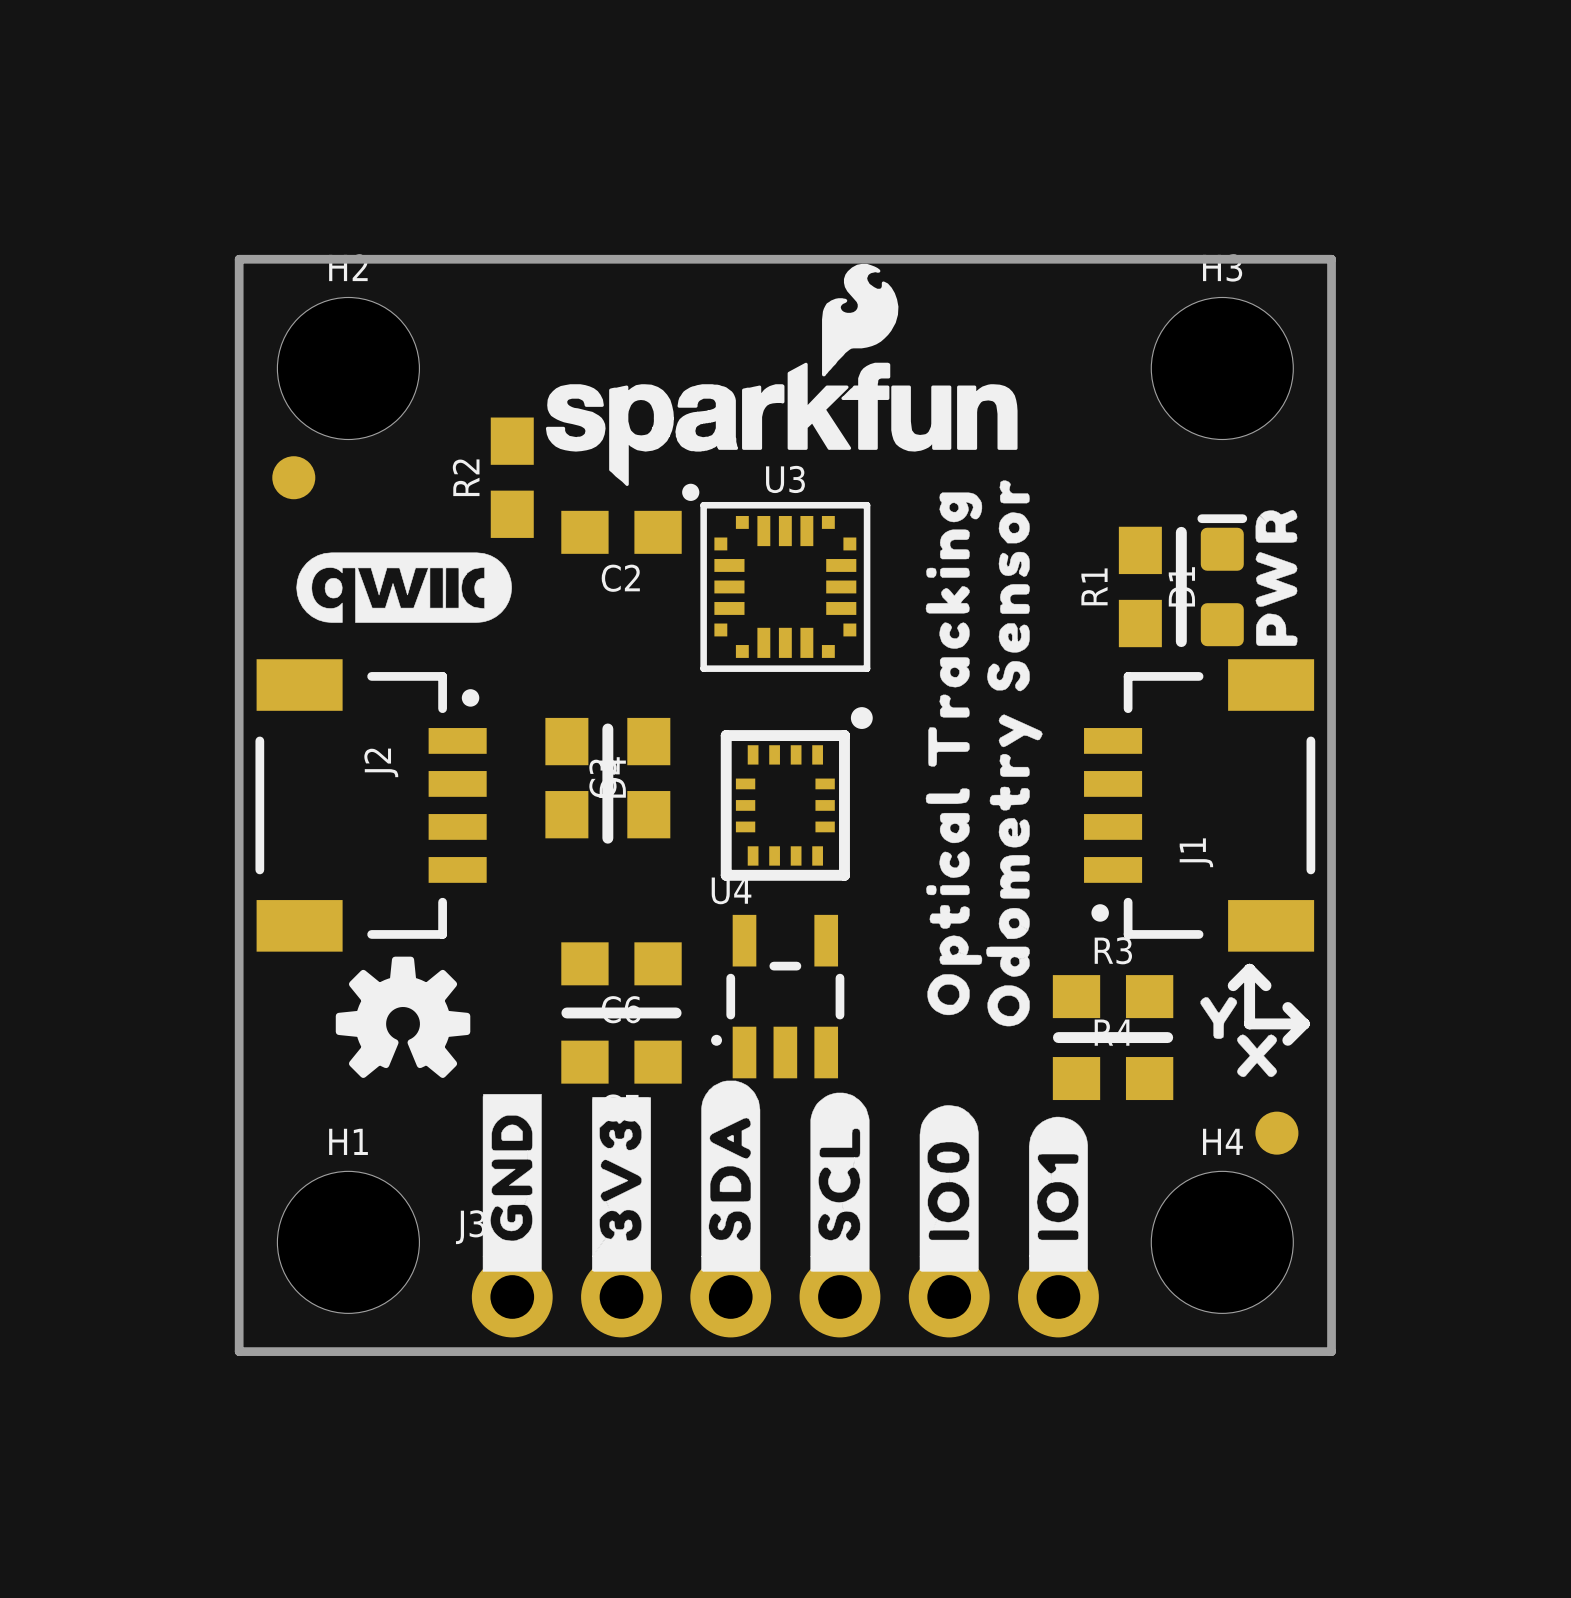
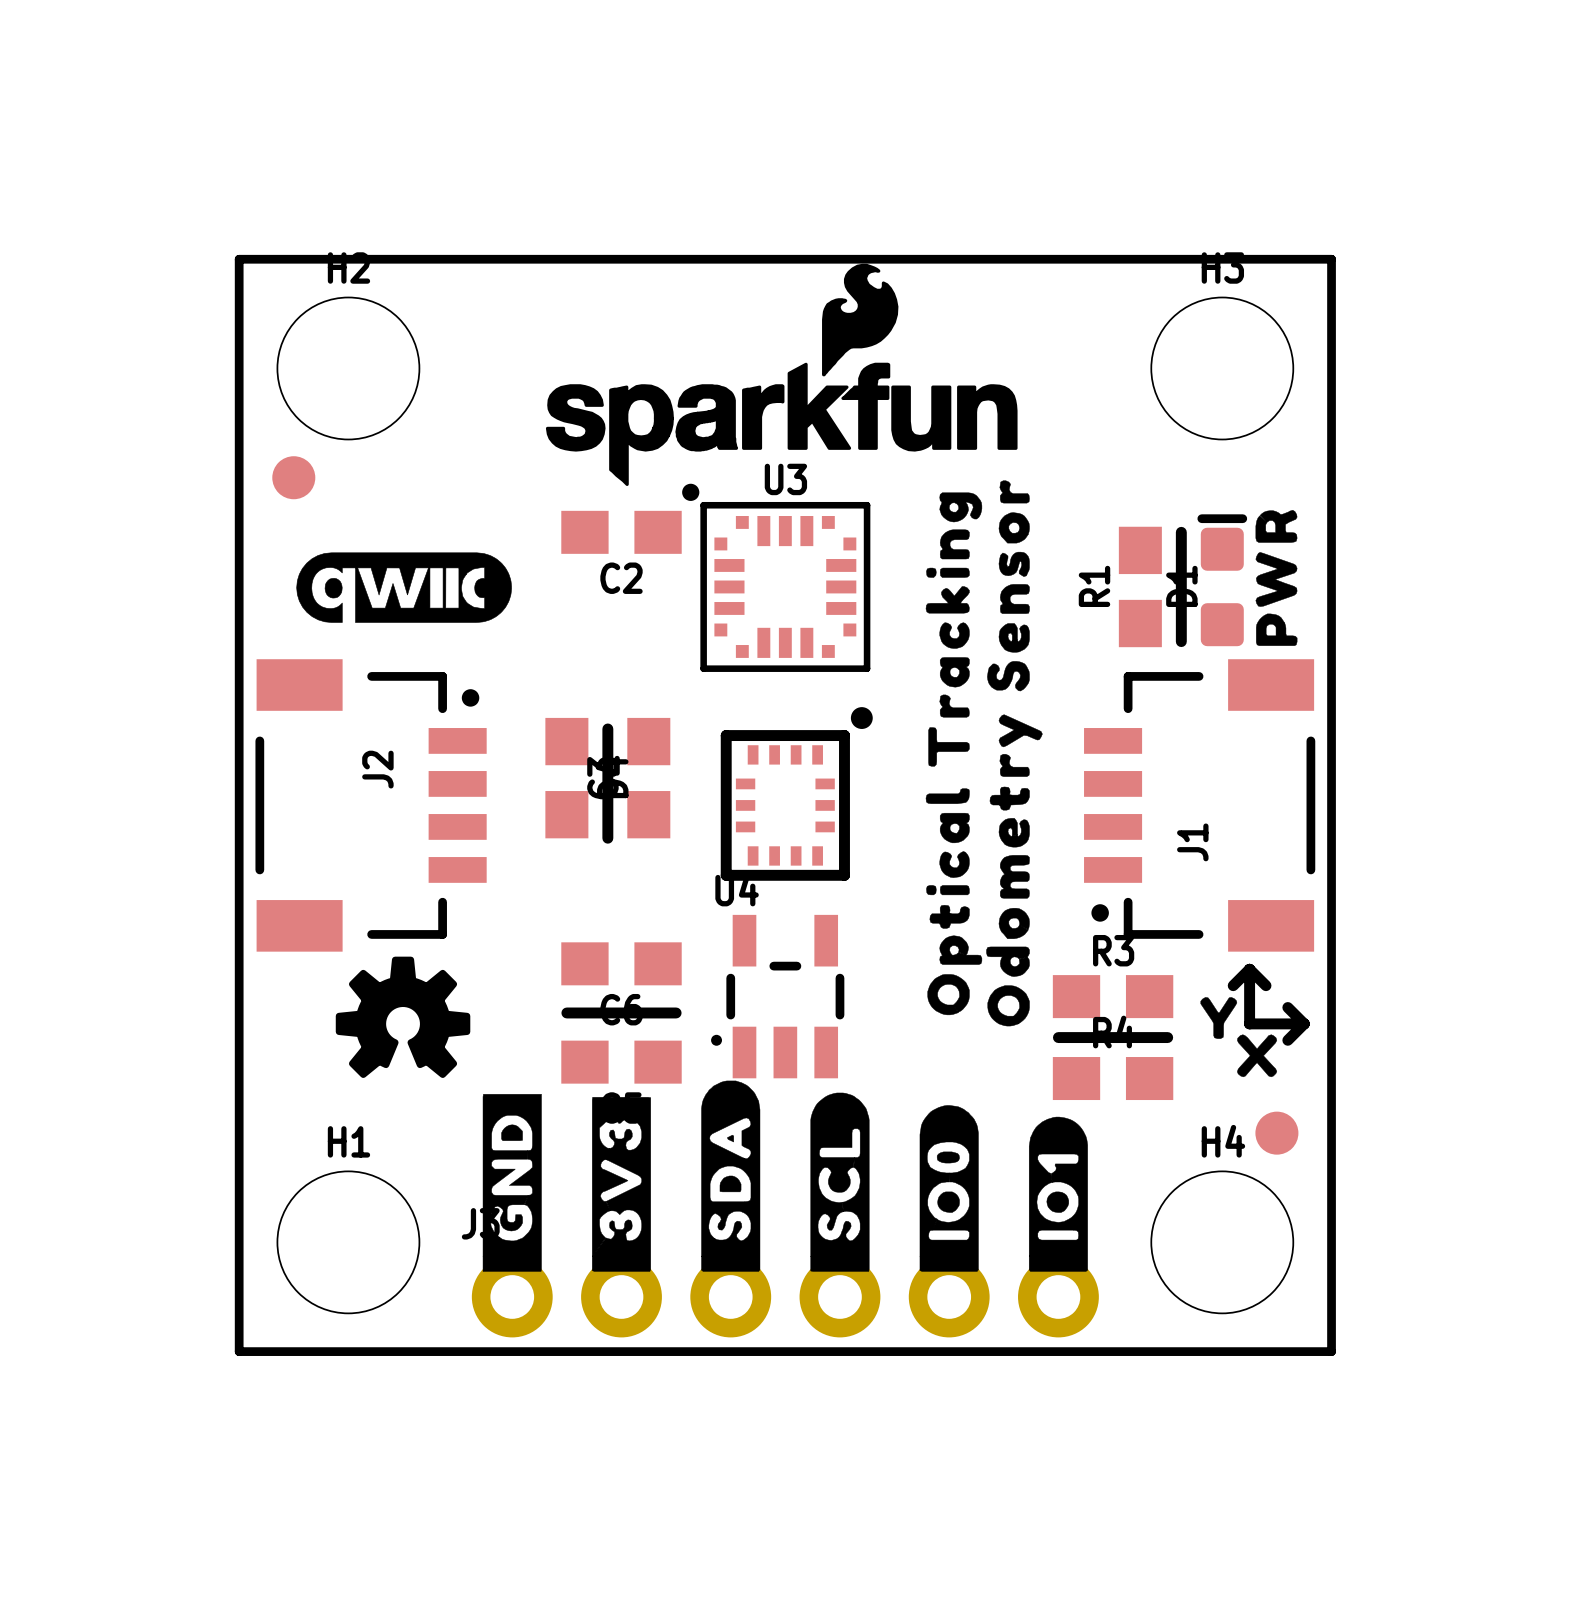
R2: (512, 477) -> none

